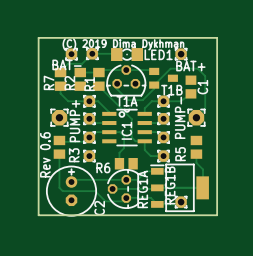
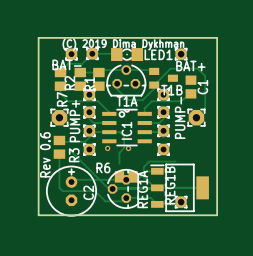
R7 name position: R7 (49, 82) -> R7 (62, 99)
track: (98, 86) (131, 119) (131, 137) (135, 141) (144, 141) (144, 150) (150, 156) (163, 156) -> none
part: none -> (89, 94)
part: none -> (163, 94)
part: (89, 101) -> none
part: (163, 101) -> none
part: none -> (89, 112)
part: none -> (163, 112)
part: (89, 118) -> none
part: (163, 118) -> none
part: none -> (89, 130)
part: none -> (163, 130)
part: (89, 137) -> none
part: (163, 137) -> none
R5: (196, 147) -> none
via: none -> (107, 148)
via: none -> (128, 148)
track: none -> (70, 149) (107, 187) (157, 187)
part: none -> (89, 149)
part: none -> (163, 149)
track: (196, 154) (196, 162) (203, 169) (202, 187) -> none
part: (89, 156) -> none
part: (163, 156) -> none
track: none -> (175, 161) (149, 161) (143, 167) (143, 176) (154, 187)
R6 position: (126, 163) -> (126, 176)
C2 name position: C2 (99, 208) -> C2 (88, 192)

